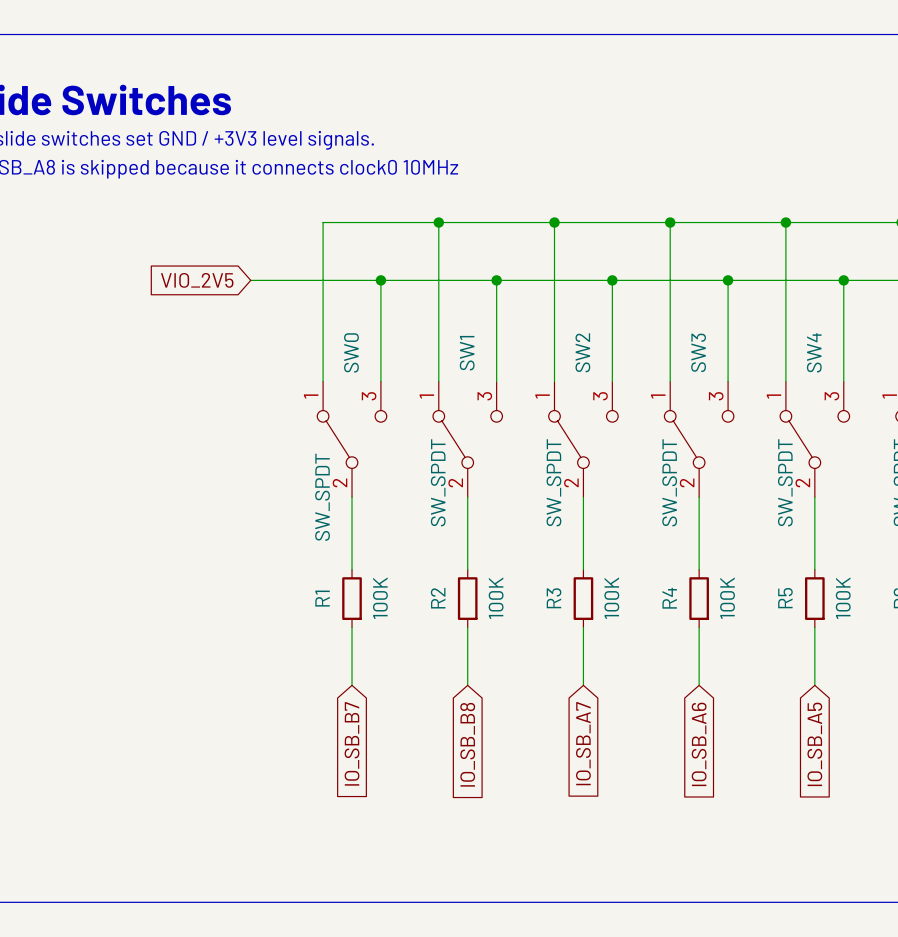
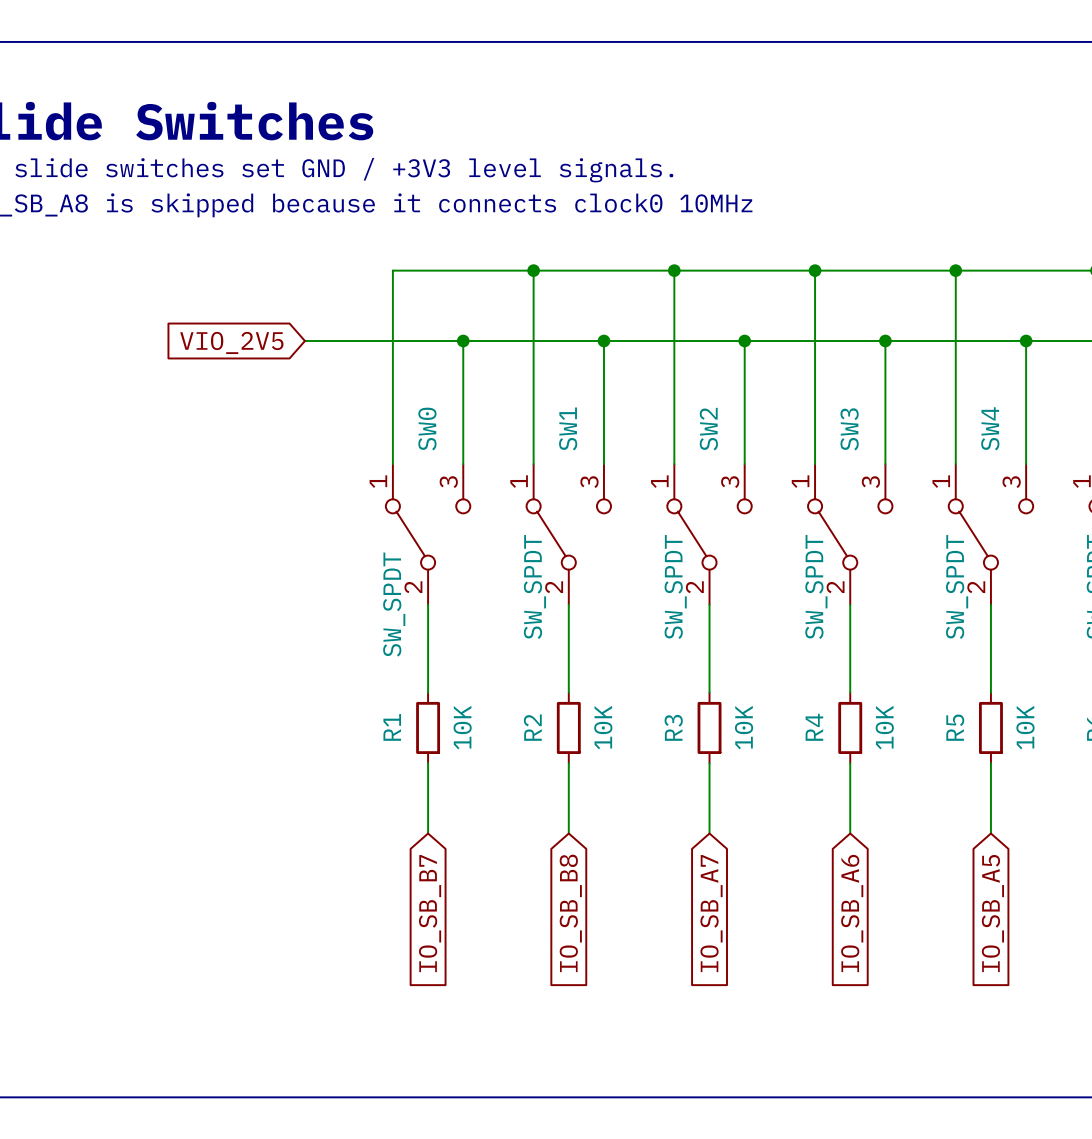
R1 value: 100K (380, 598) -> 10K (462, 727)
R2 value: 100K (496, 598) -> 10K (603, 727)
R3 value: 100K (611, 598) -> 10K (744, 727)
R4 value: 100K (727, 598) -> 10K (884, 727)
R5 value: 100K (843, 598) -> 10K (1025, 727)

